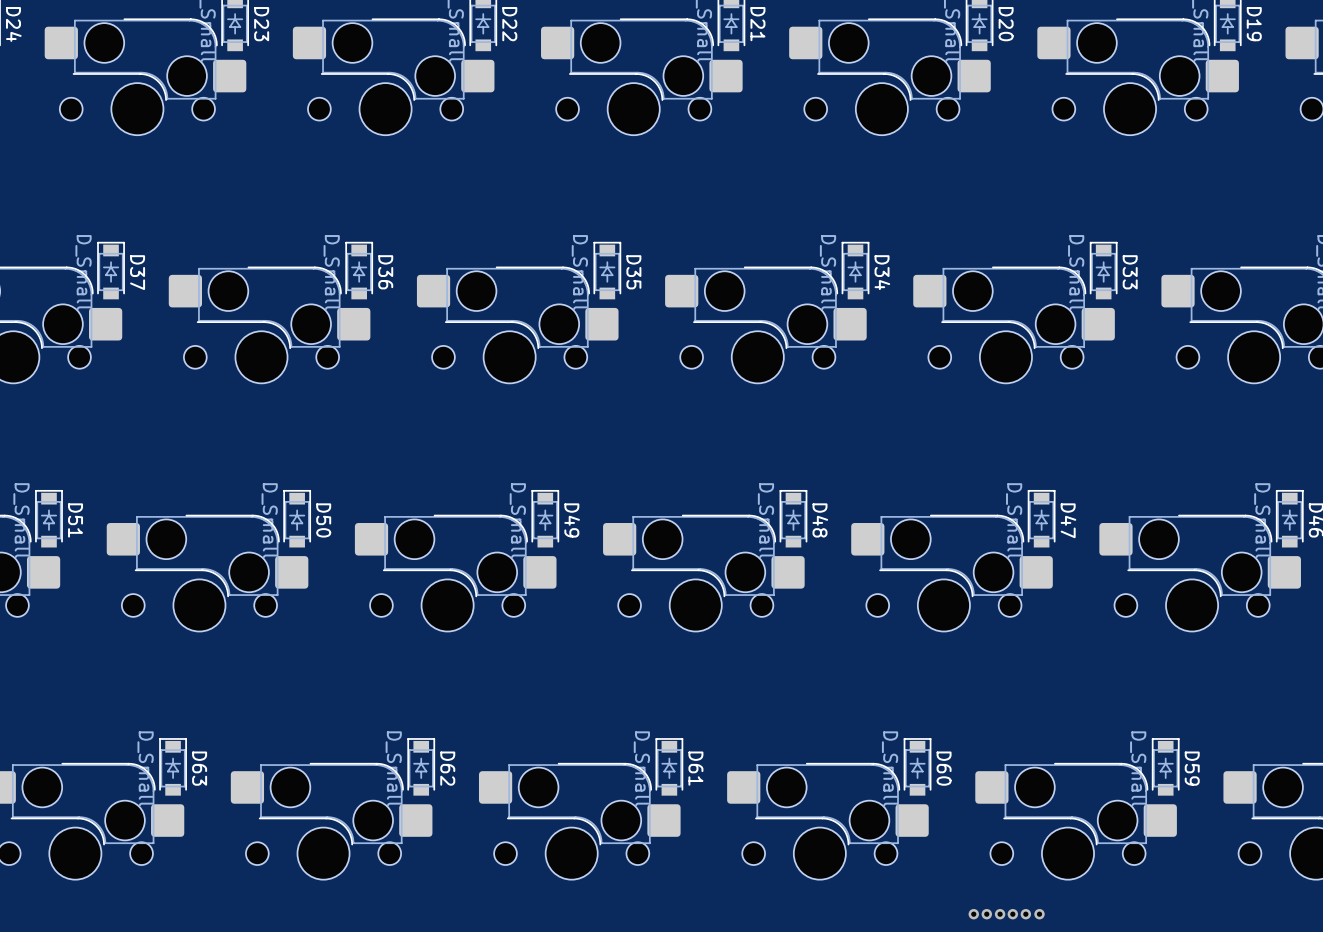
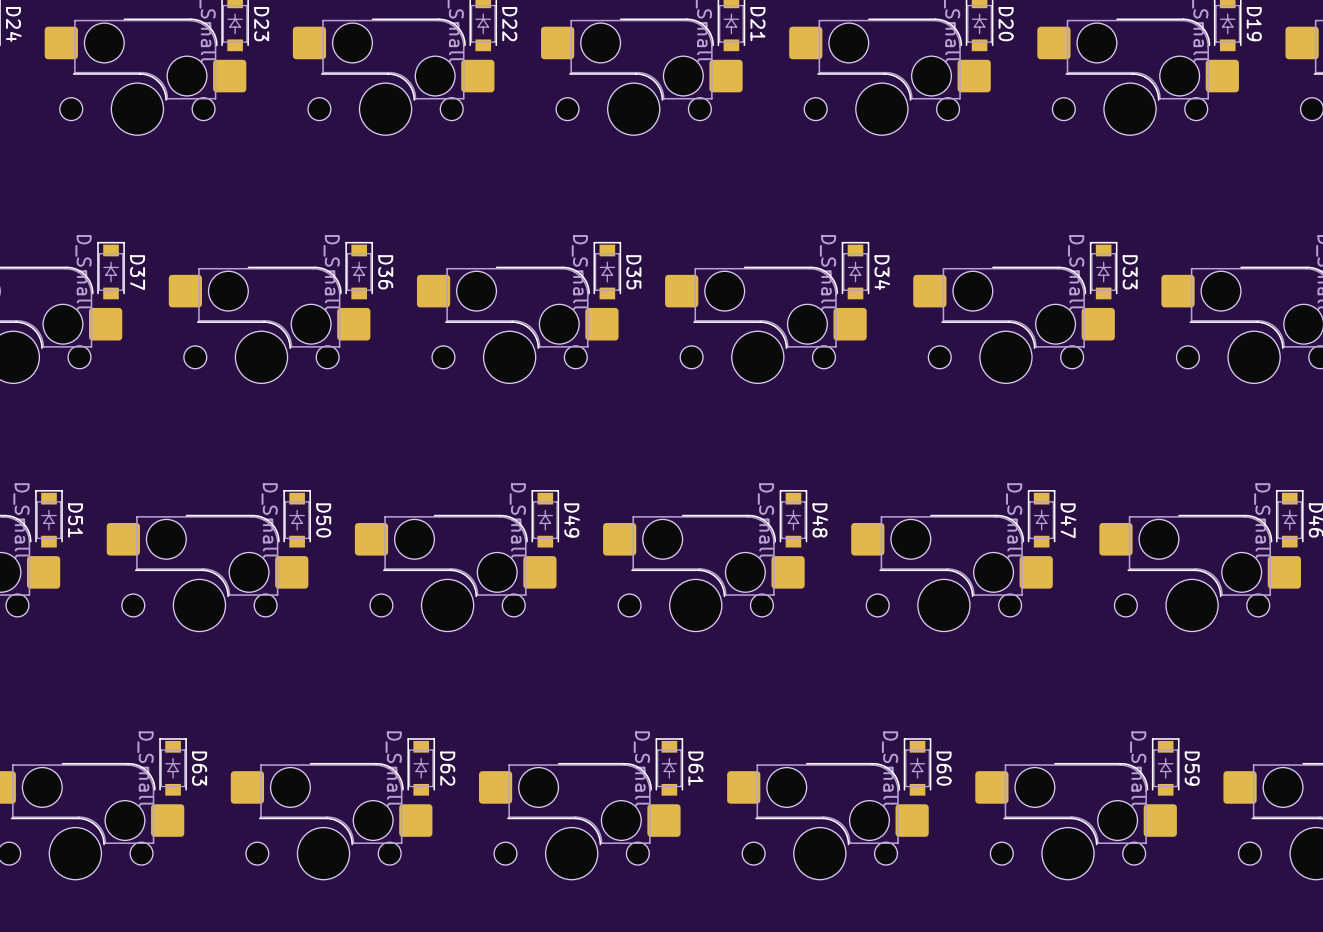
via: (973, 914) -> none
via: (986, 914) -> none
via: (1000, 914) -> none
via: (1012, 914) -> none
via: (1025, 914) -> none
via: (1039, 914) -> none

